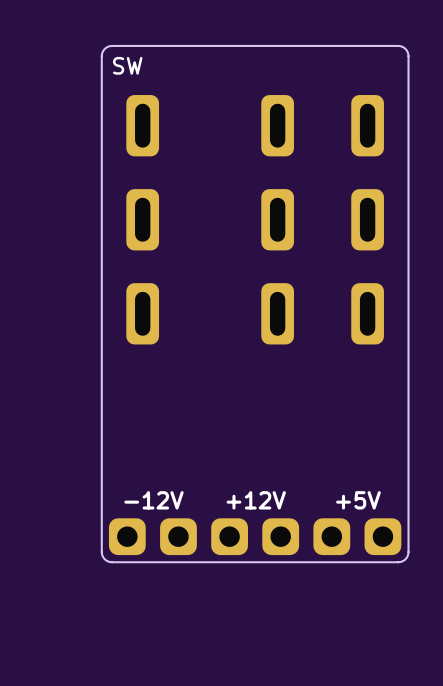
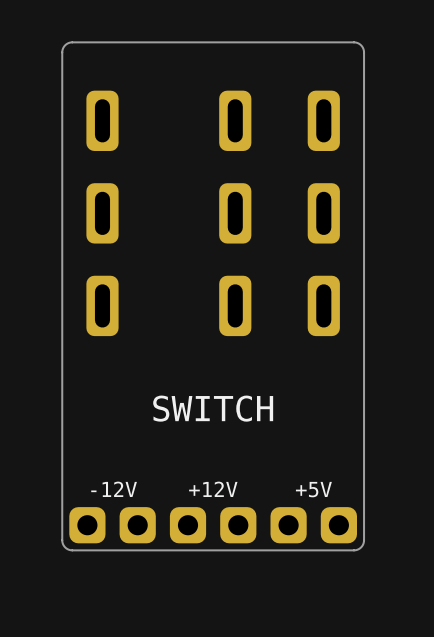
text: SW (127, 65) -> none
text: none -> SWITCH (213, 408)

